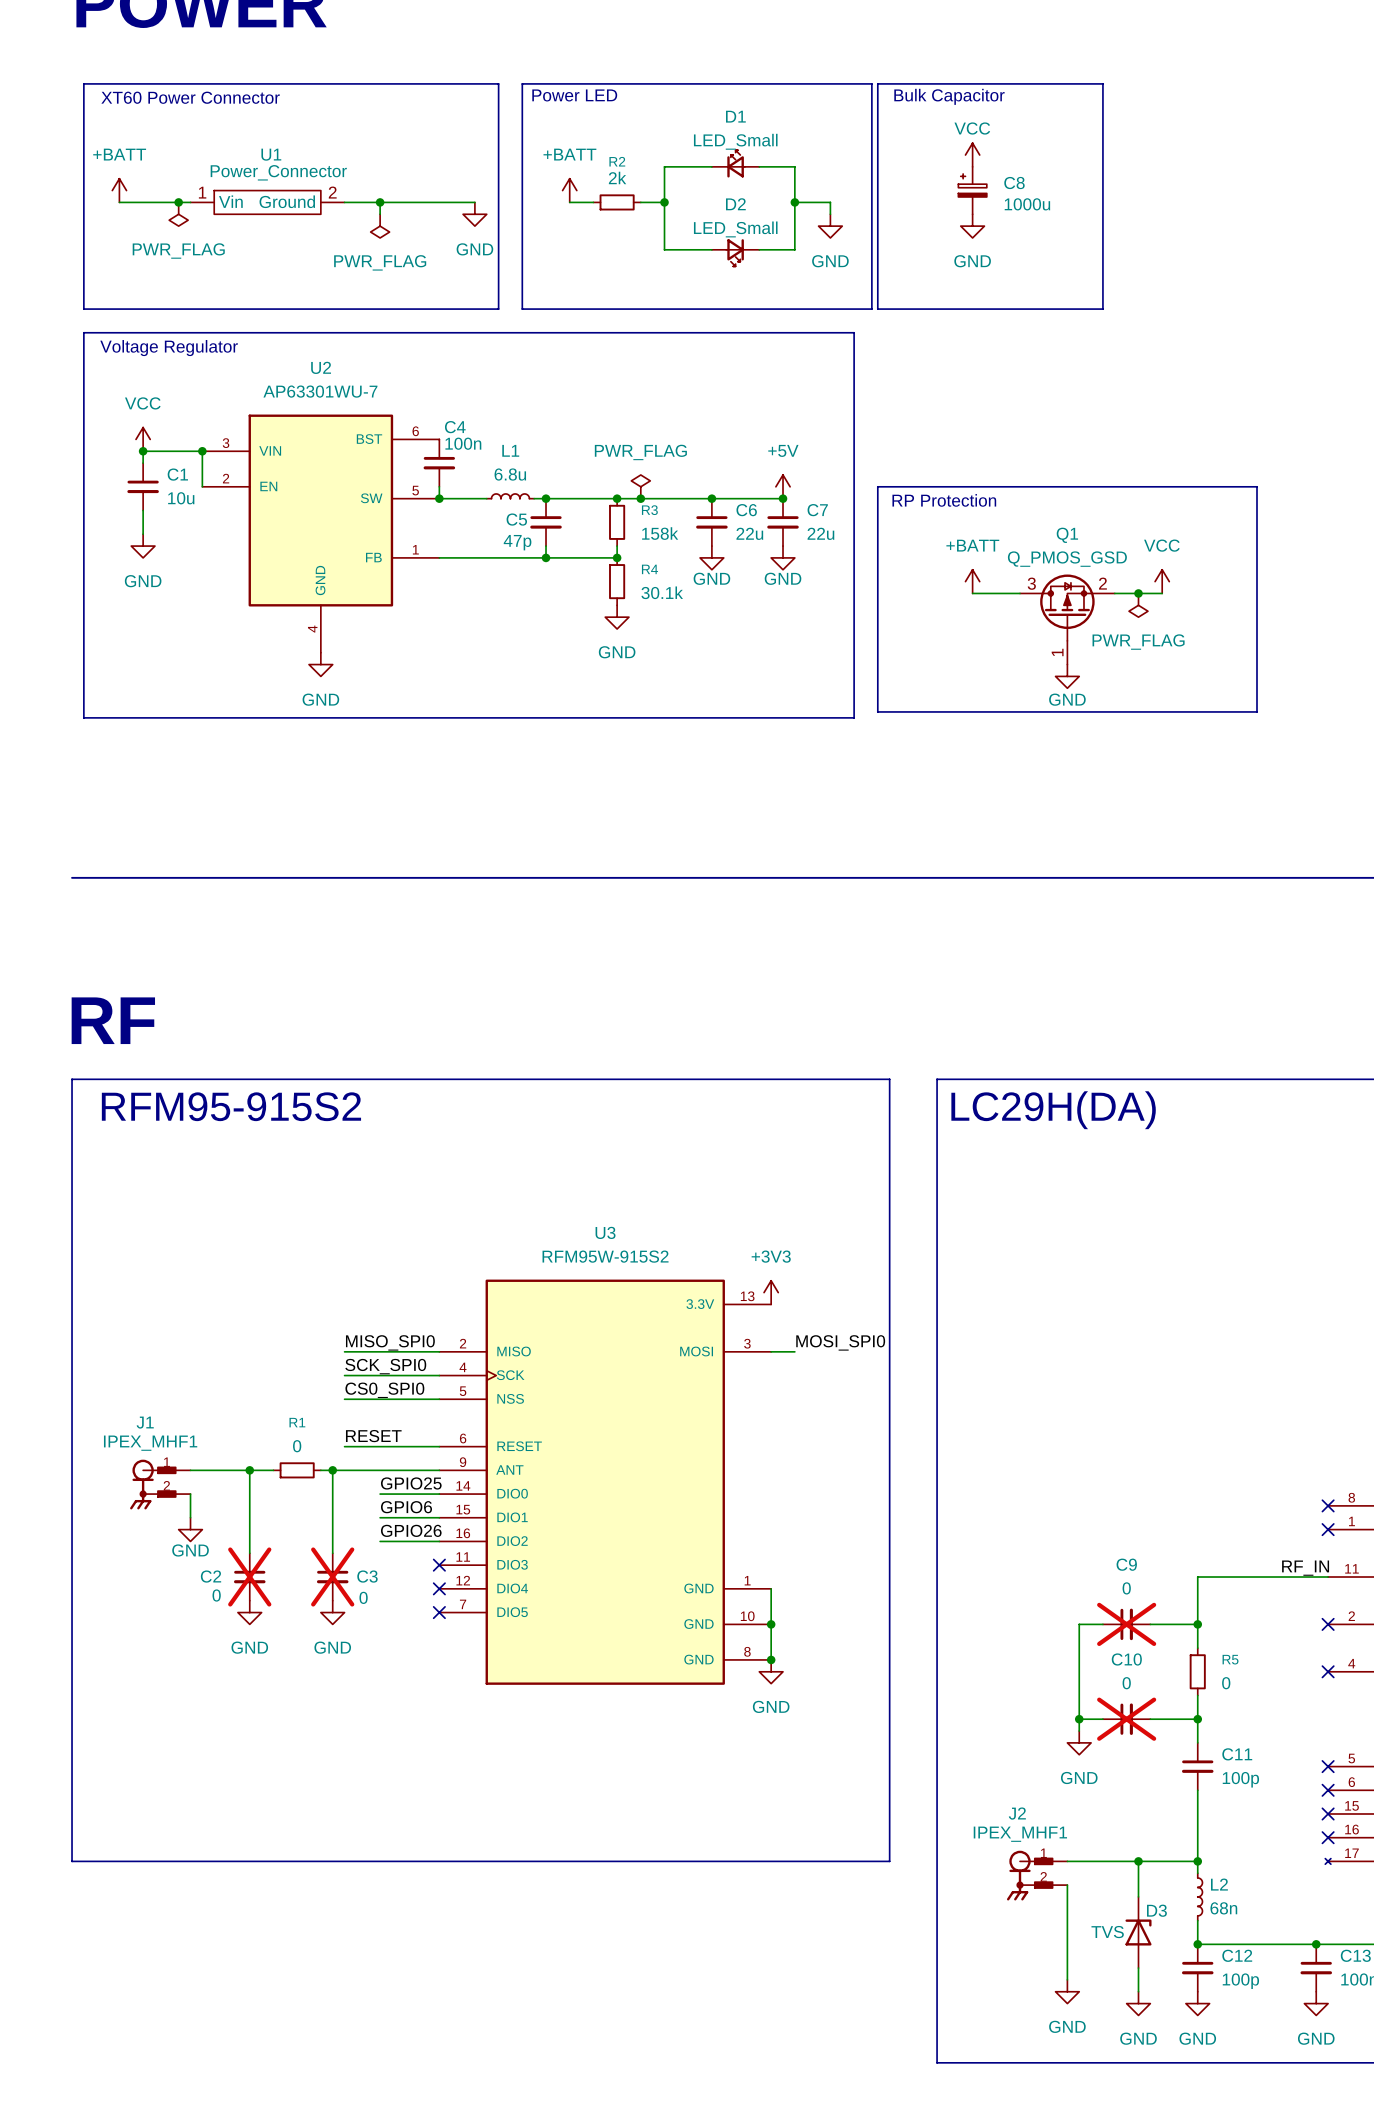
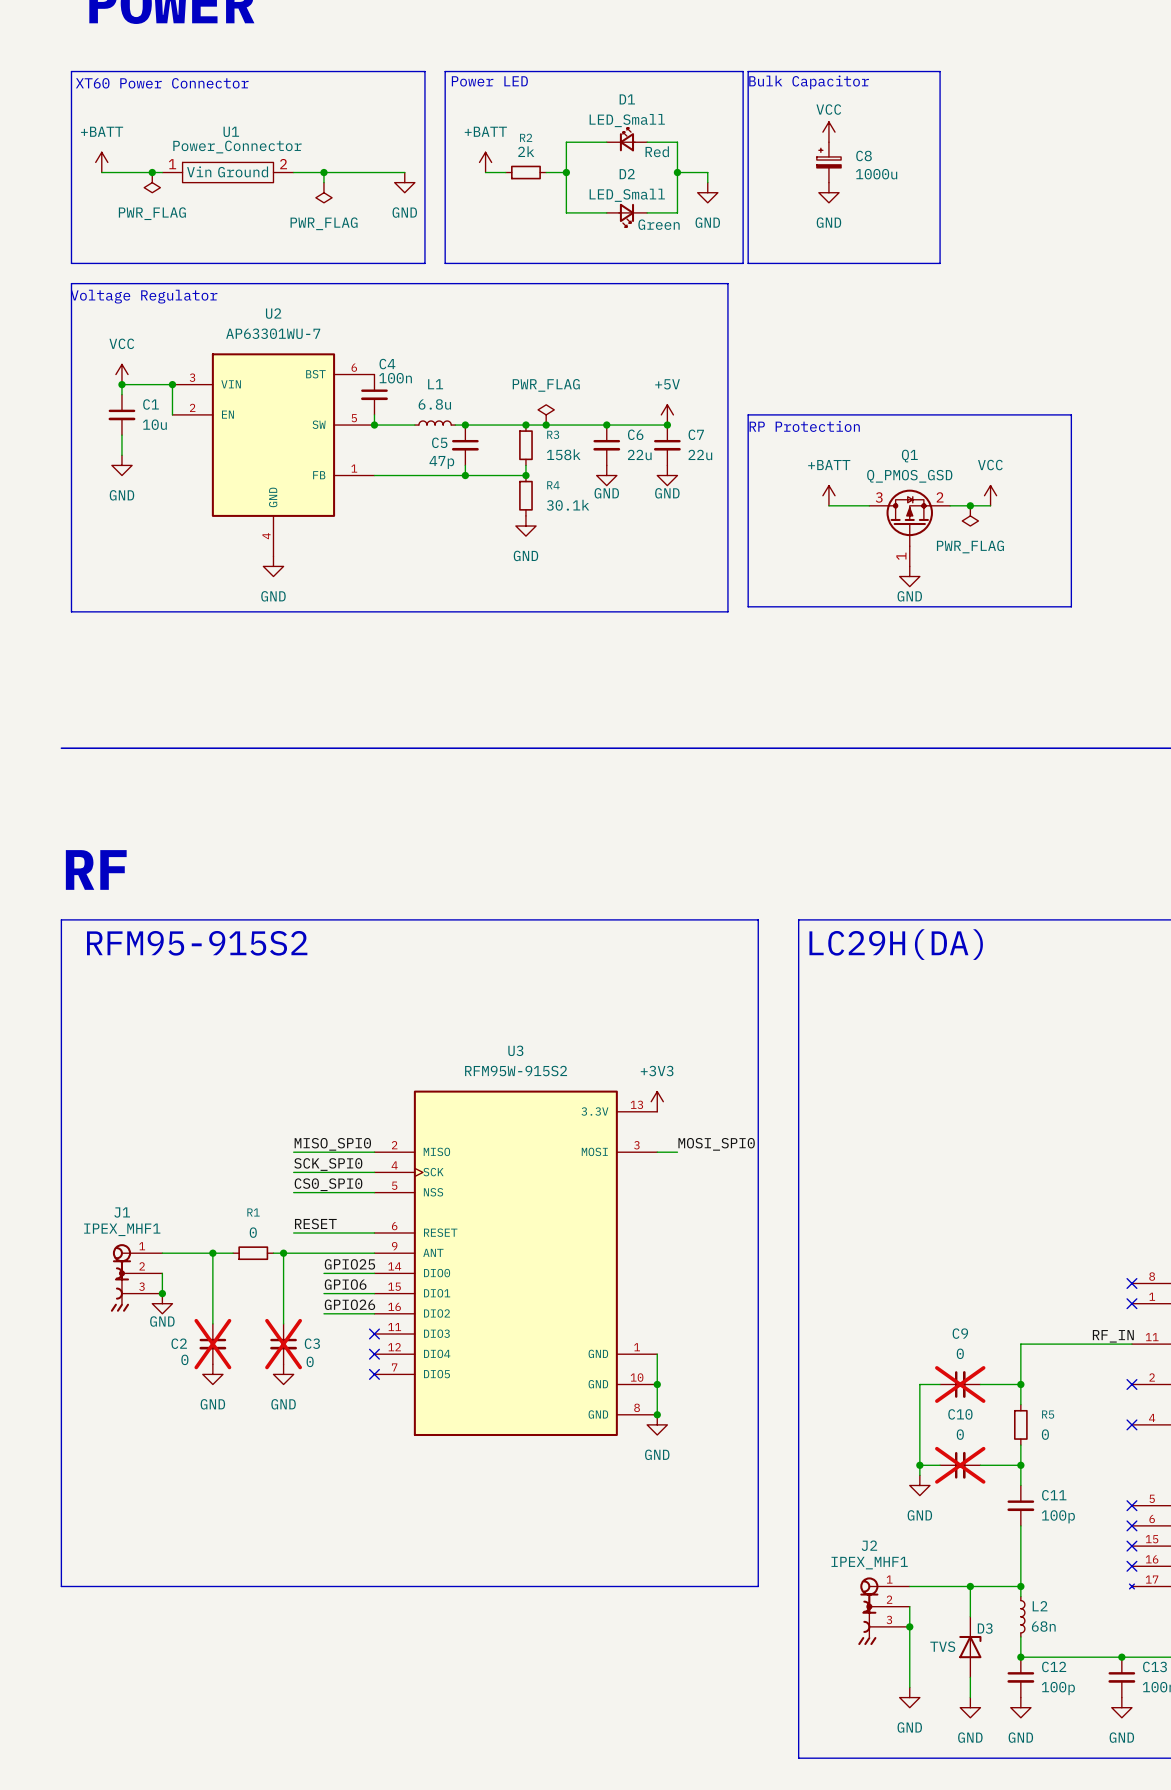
D1 text: none -> Red (657, 151)
D2 text: none -> Green (659, 224)
J1 symbol: [130, 1459, 191, 1510] -> [110, 1244, 163, 1312]
junction: none -> (162, 1293)
J2 symbol: [1006, 1850, 1068, 1901] -> [858, 1577, 910, 1646]
junction: none -> (909, 1626)

